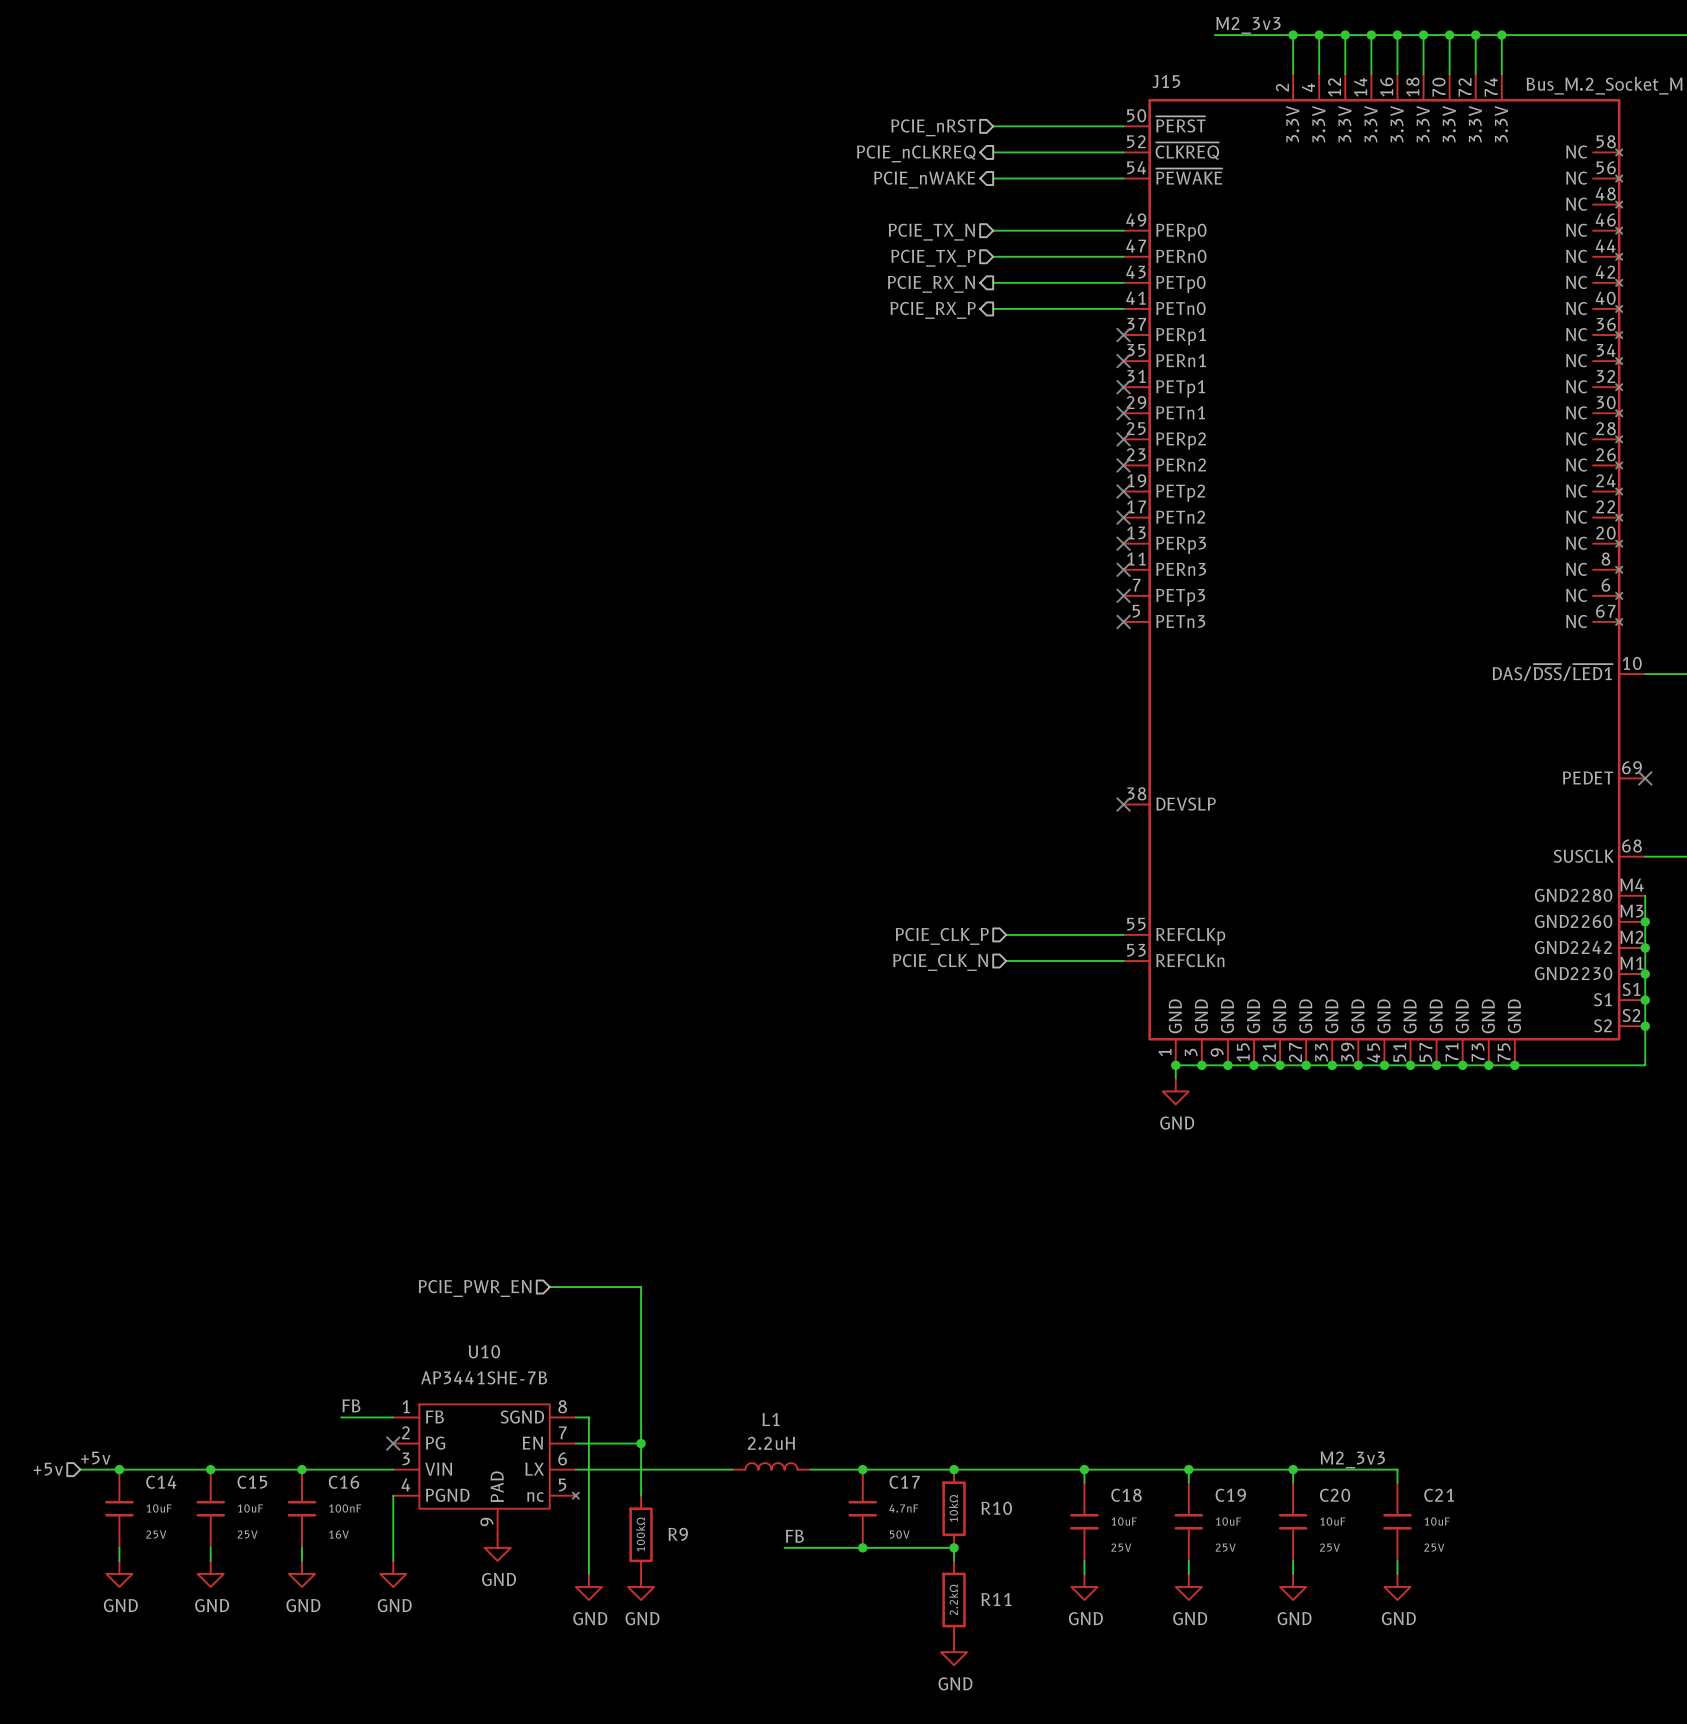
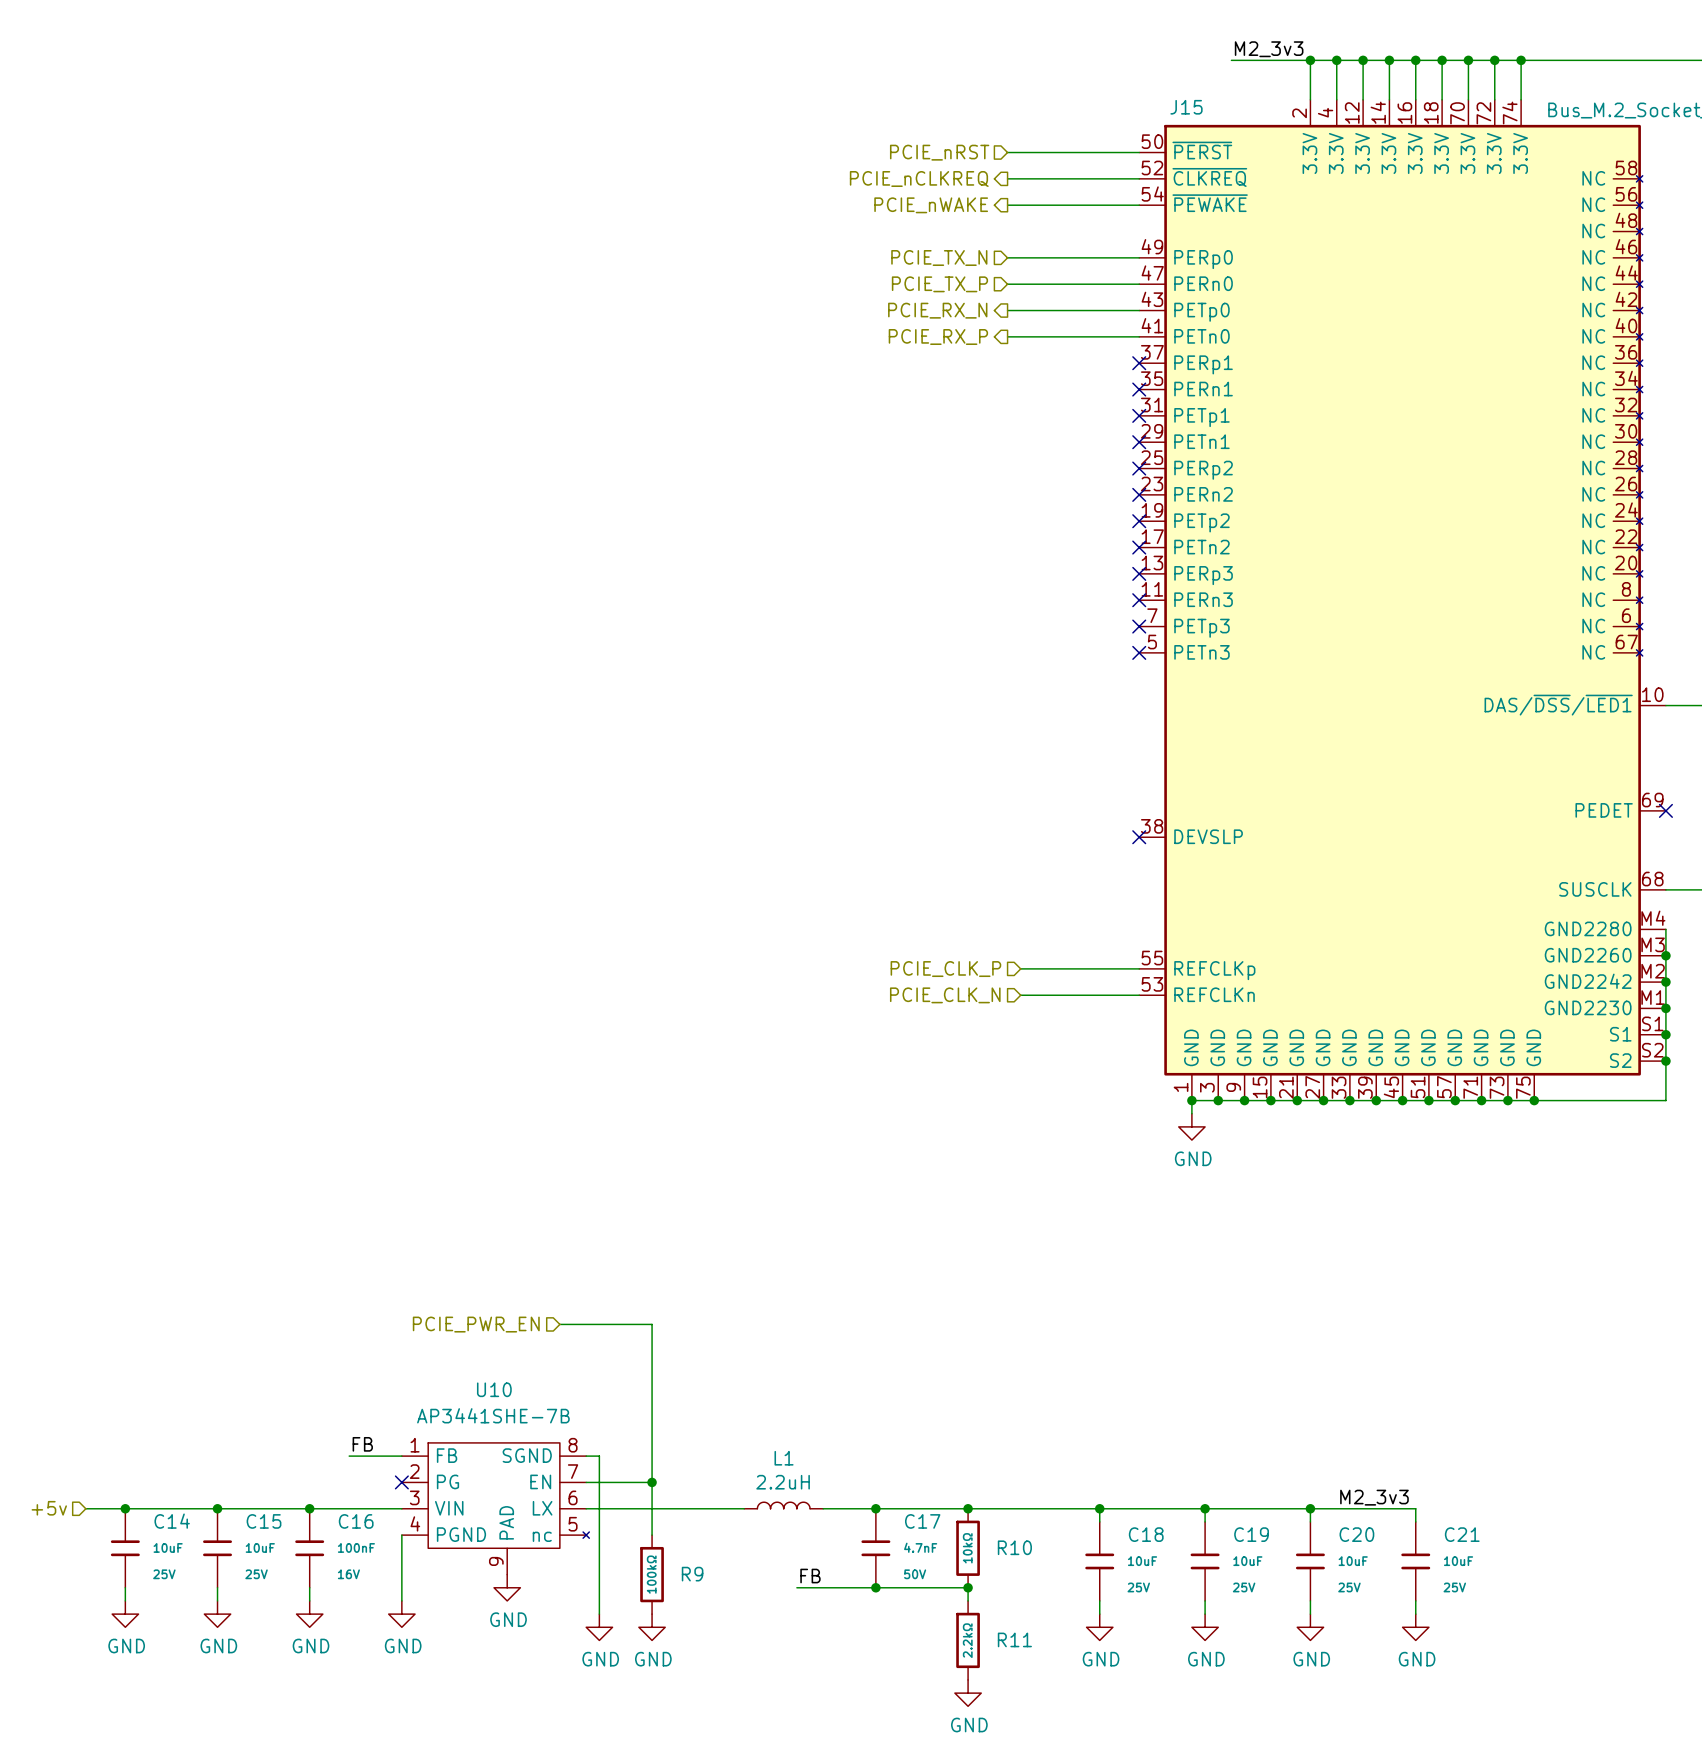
label: +5v (95, 1458) -> none

